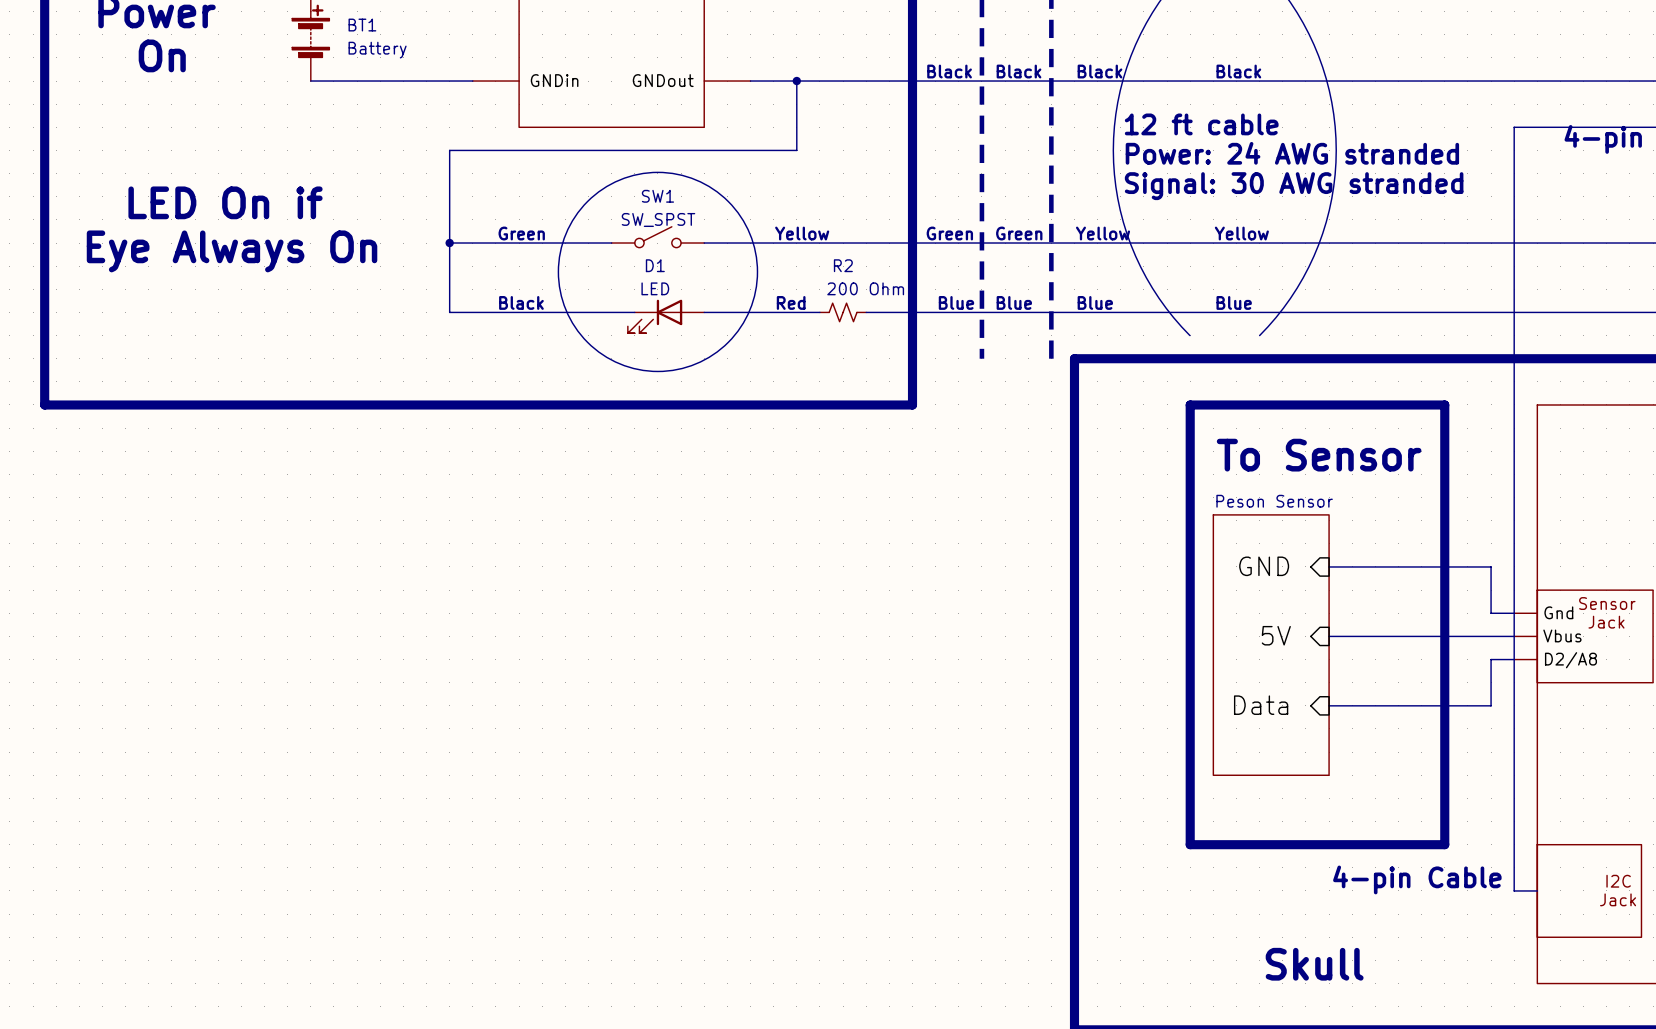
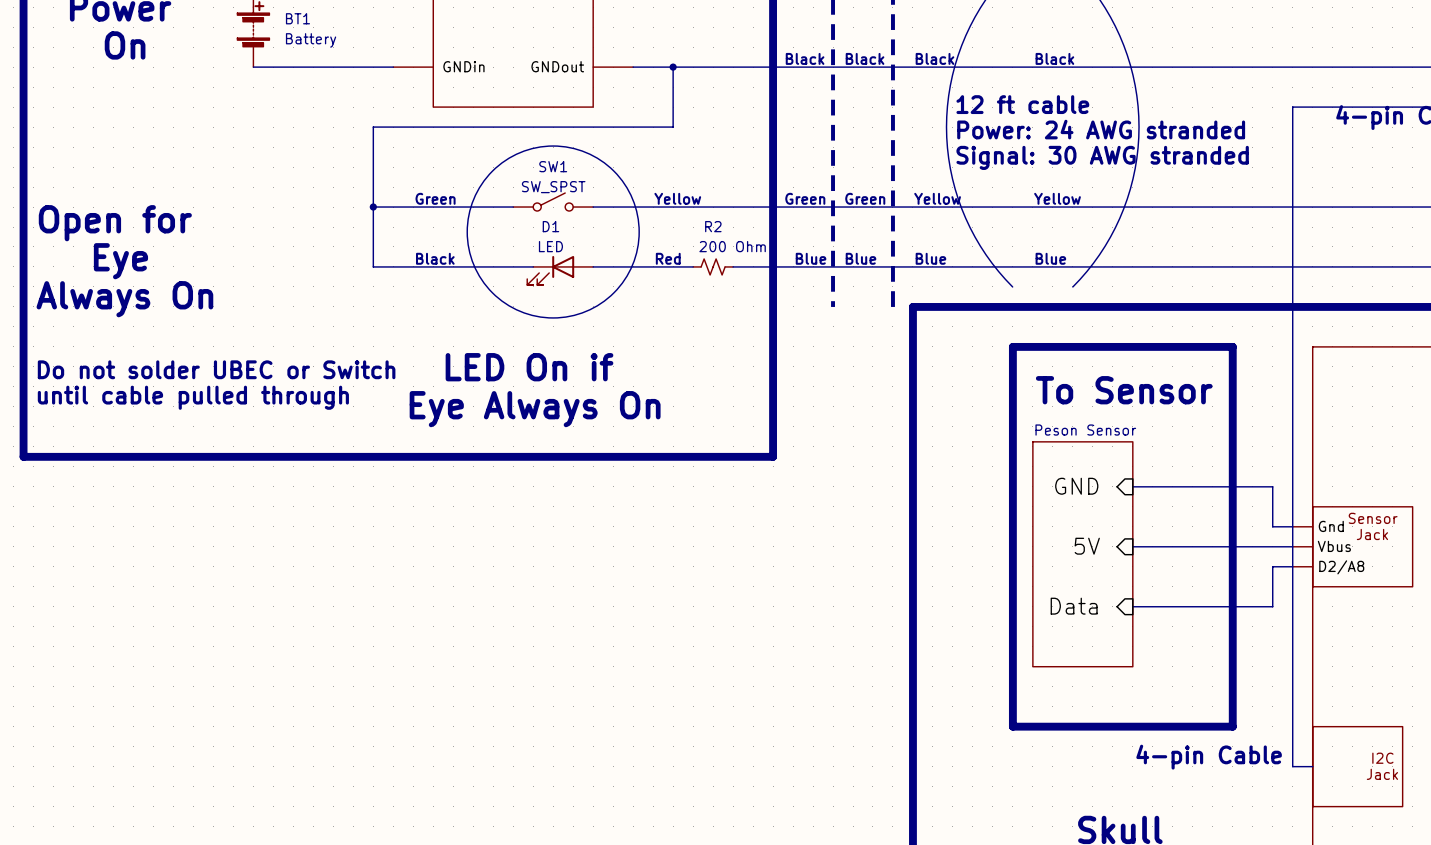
text: LED On if (225, 202) -> none
text: Eye Always On (232, 251) -> none
text: none -> Open for (115, 223)
text: none -> Eye (120, 261)
text: none -> Always On (124, 299)
line: (44, 404) (912, 404) -> (23, 346) (23, 456) (773, 456) (773, 346)
text: none -> LED On if (529, 367)
text: none -> Do not solder UBEC or Switch (216, 369)
text: none -> until cable pulled through (193, 397)
text: none -> Eye Always On (535, 409)

